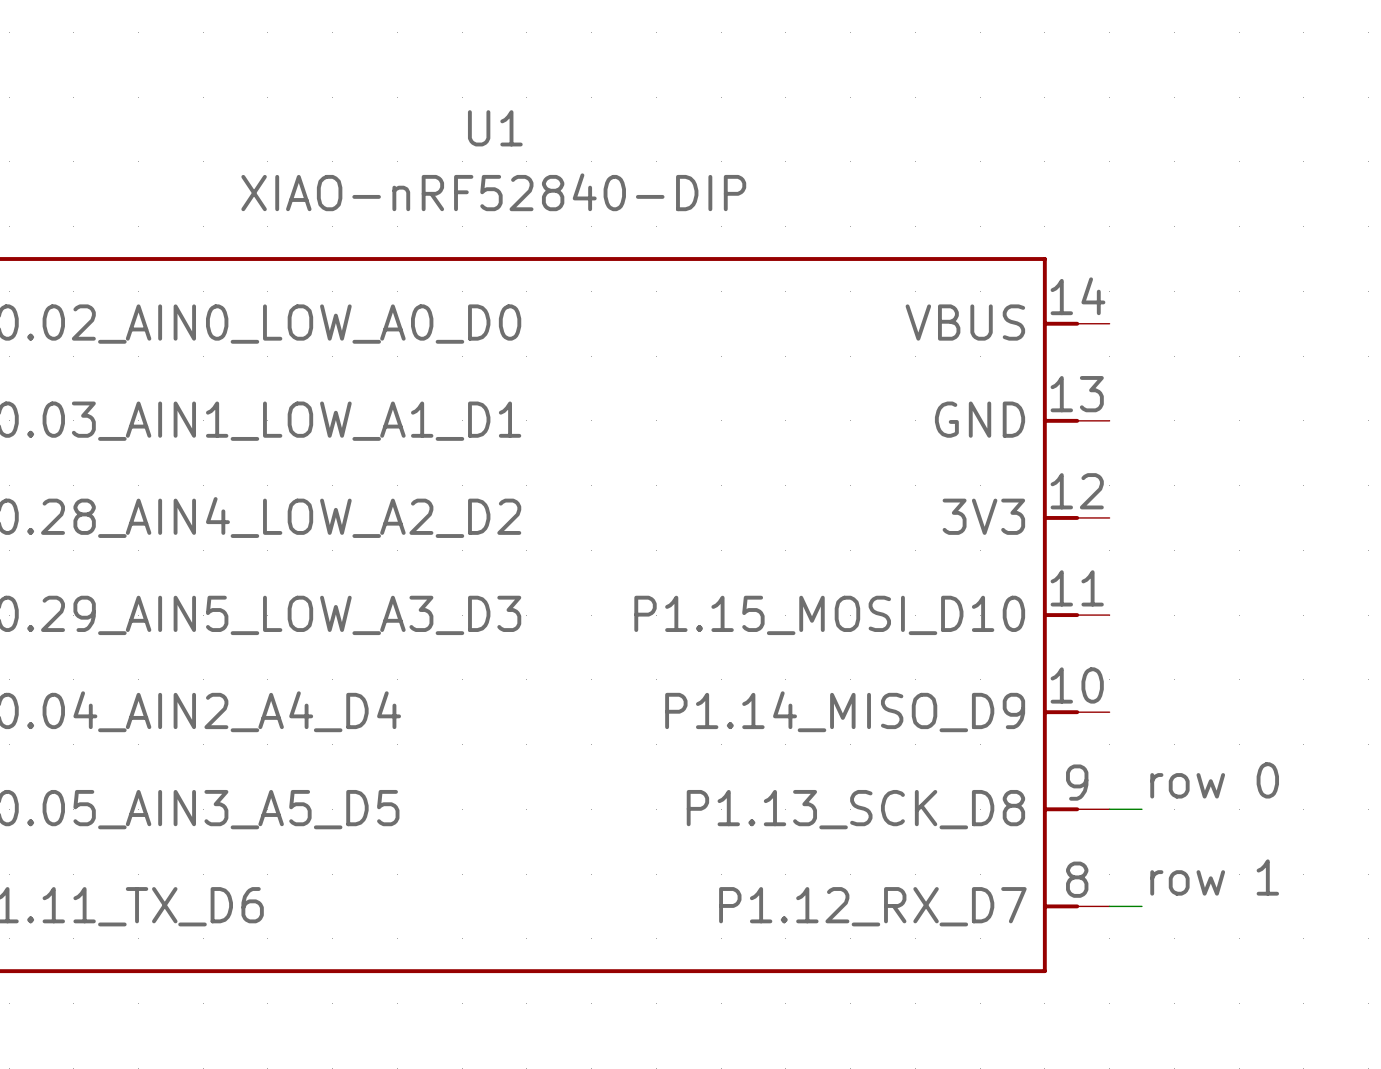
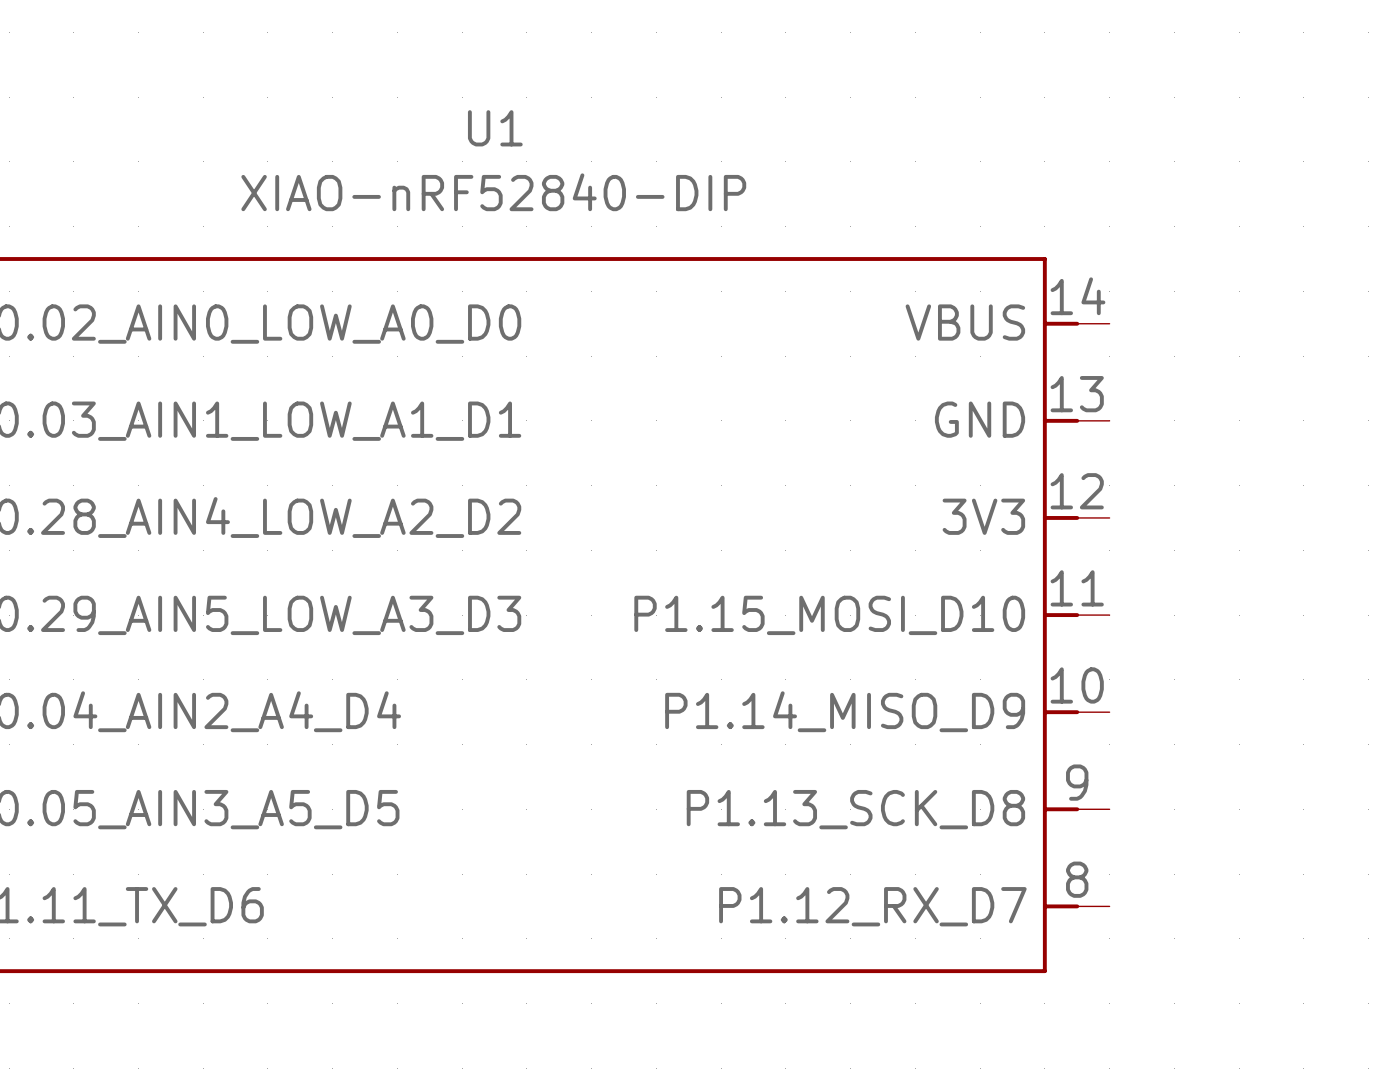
label: row 0 (1214, 780) -> none
wire: (1109, 809) (1141, 809) -> none
label: row 1 (1214, 877) -> none
wire: (1109, 906) (1141, 906) -> none

